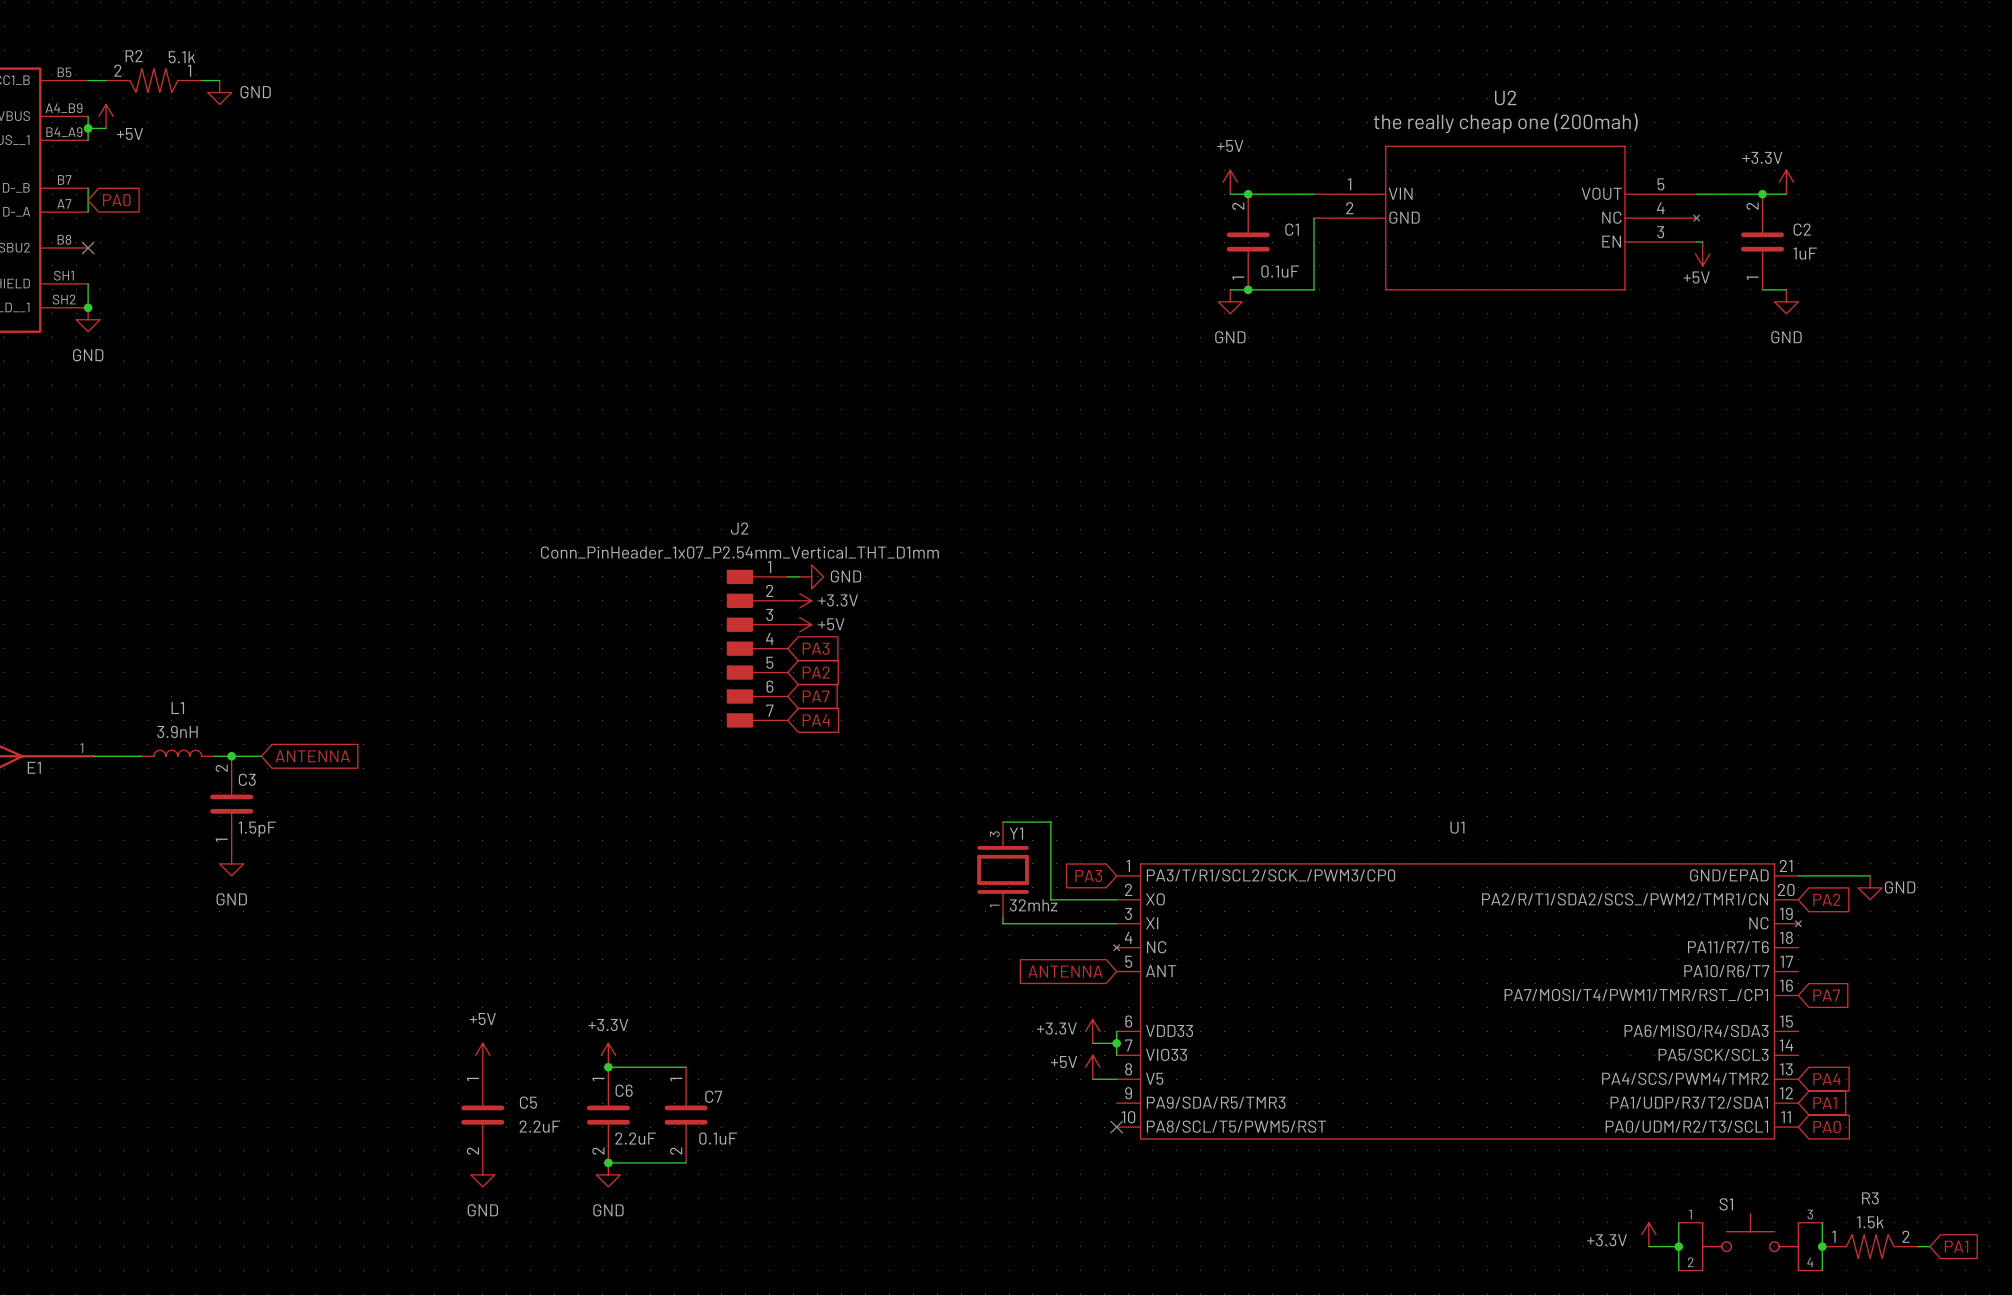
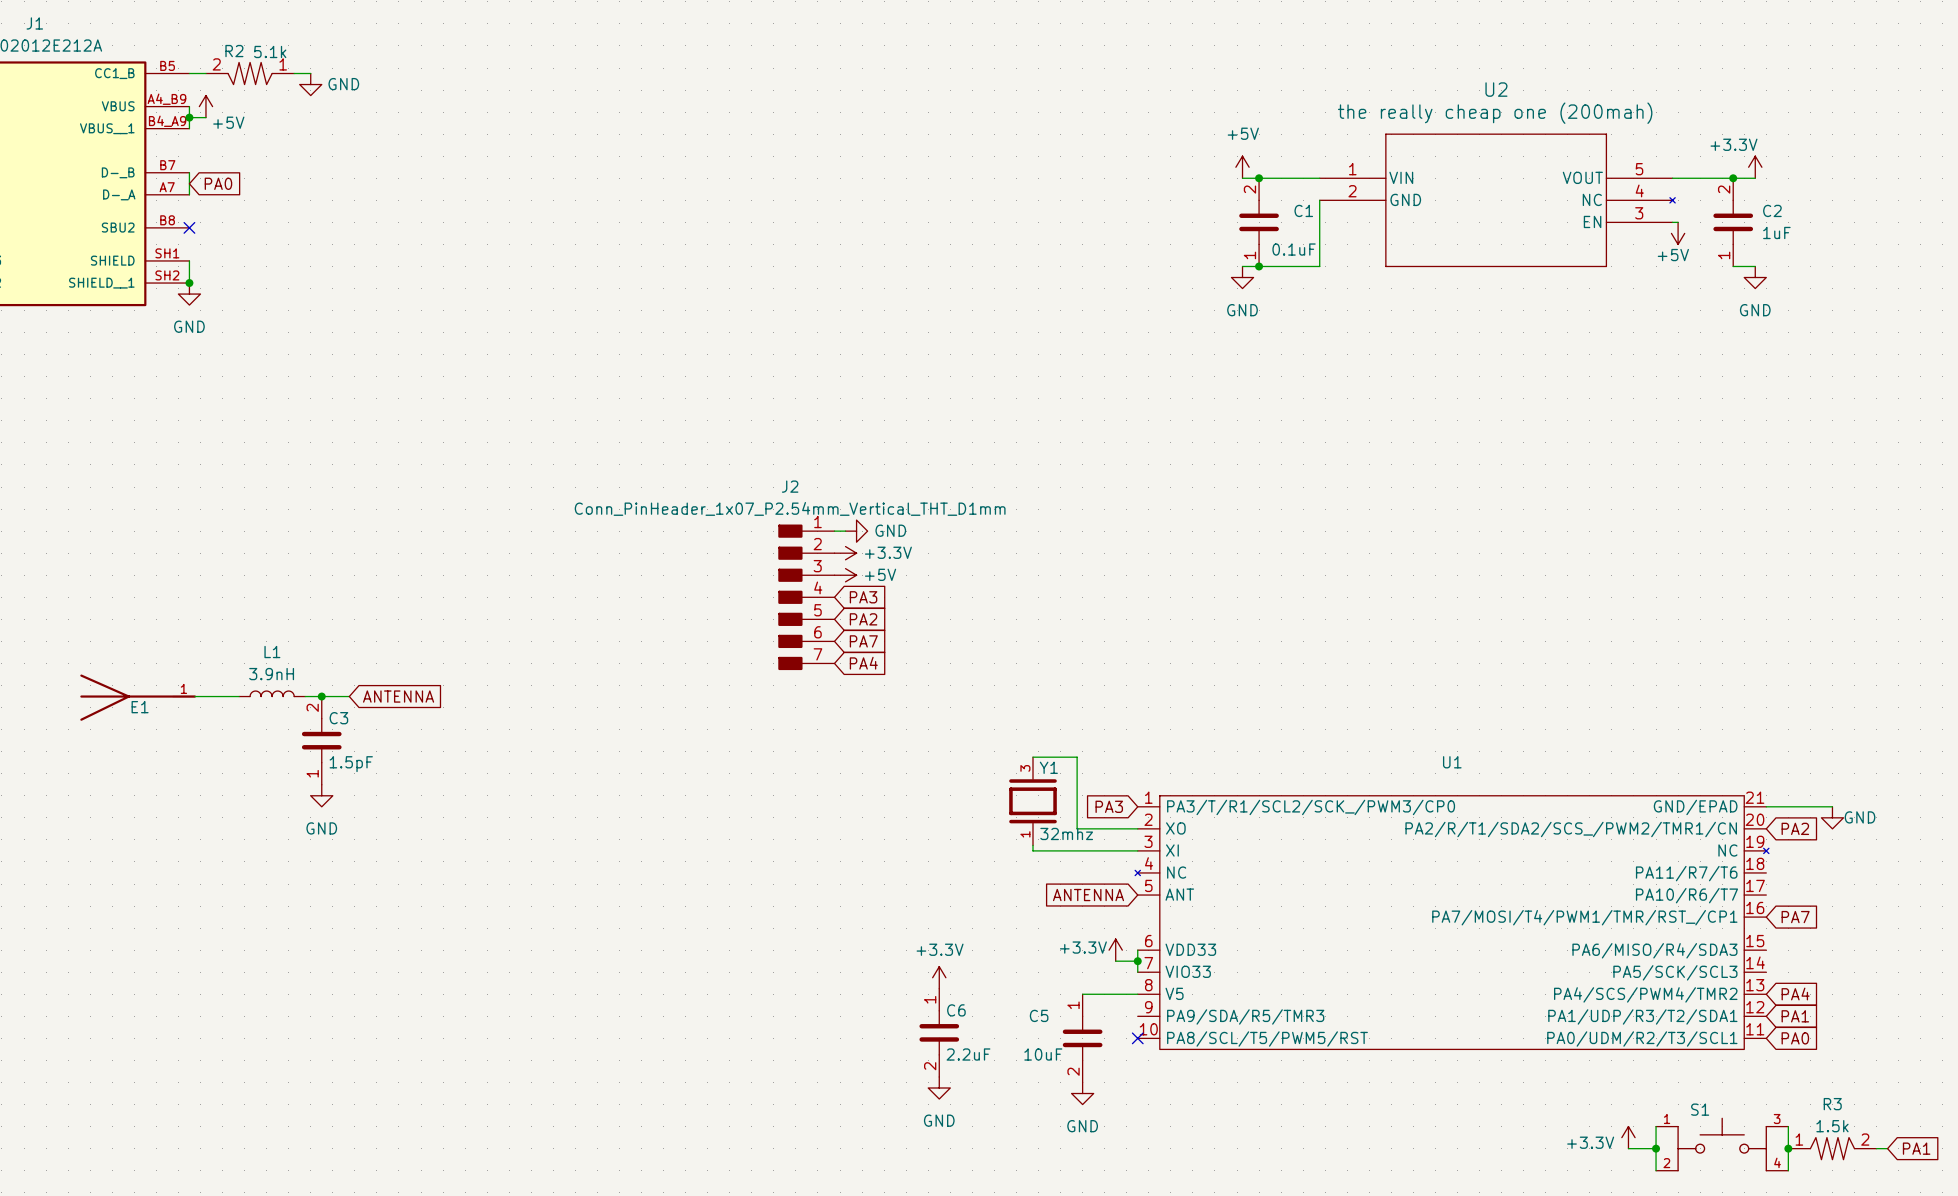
power symbol: +5V (482, 1055) -> none
power symbol: +3.3V (608, 1055) -> none
power symbol: none -> +3.3V (939, 977)
wire: (608, 1067) (686, 1067) -> none
junction: (608, 1067) -> none
power symbol: +5V (1092, 1067) -> none
wire: none -> (1082, 994) (1115, 994)
C5 name position: C5 (528, 1102) -> C5 (1039, 1015)
C5 position: (482, 1115) -> (1082, 1038)
C6 position: (608, 1115) -> (939, 1032)
C7: 0.1uF (686, 1115) -> none
C5 value: 2.2uF (539, 1126) -> 10uF (1043, 1054)
wire: (608, 1162) (686, 1162) -> none
junction: (608, 1162) -> none
power symbol: GND (482, 1174) -> none
power symbol: GND (608, 1174) -> none
power symbol: none -> GND (939, 1088)
power symbol: none -> GND (1082, 1093)

